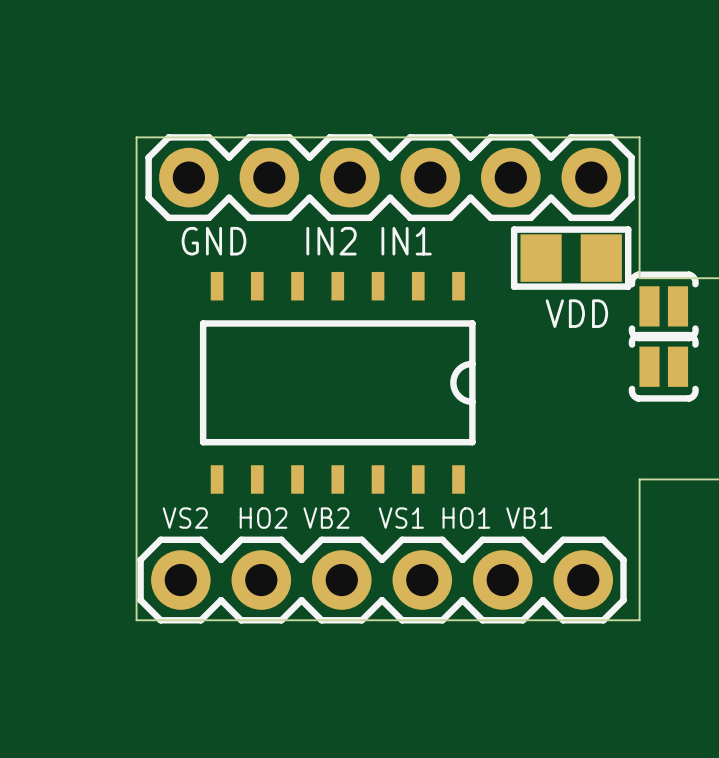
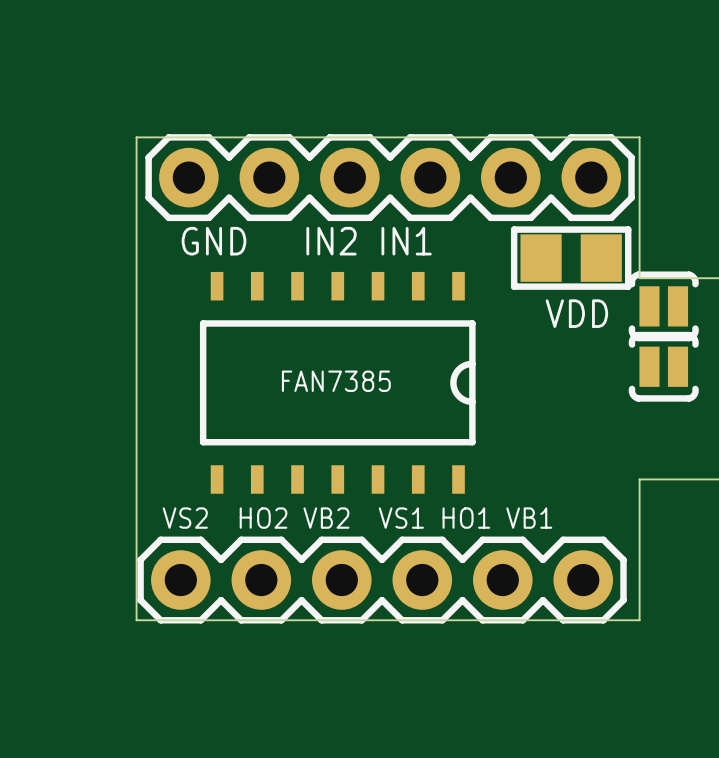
text: none -> FAN7385 (336, 381)

